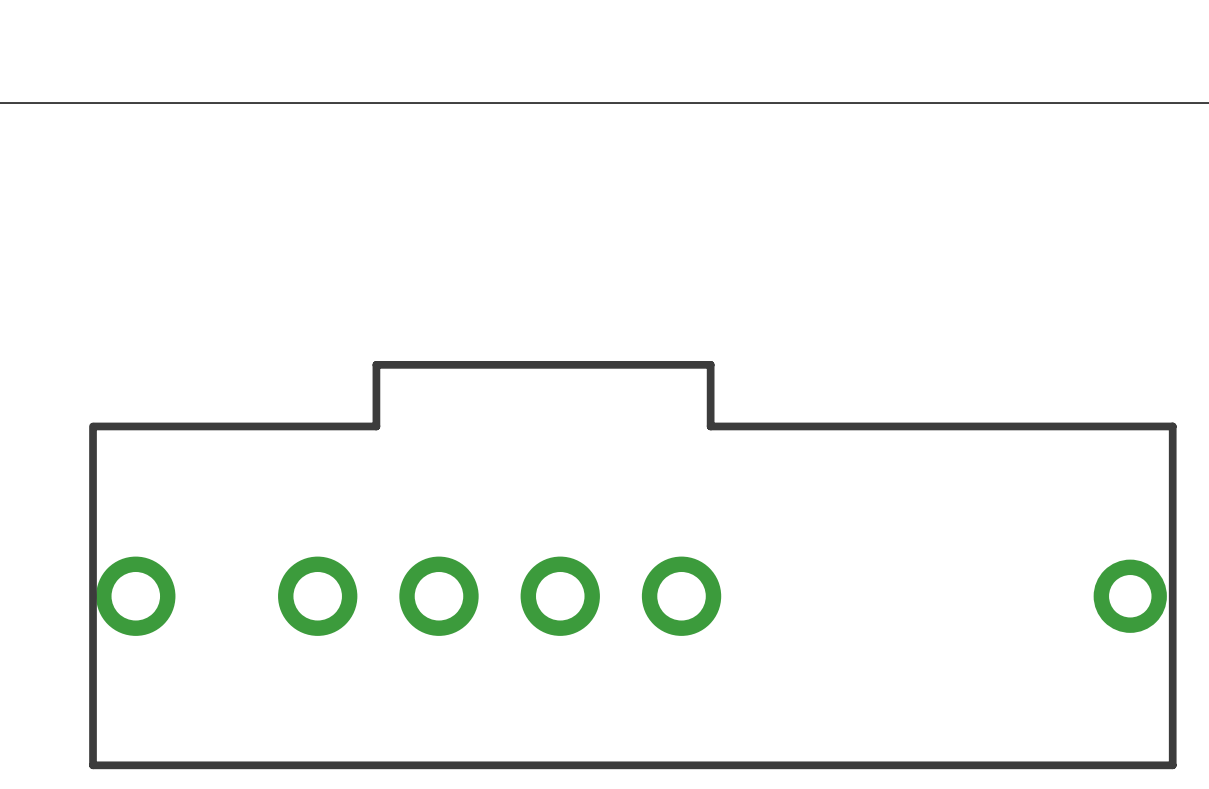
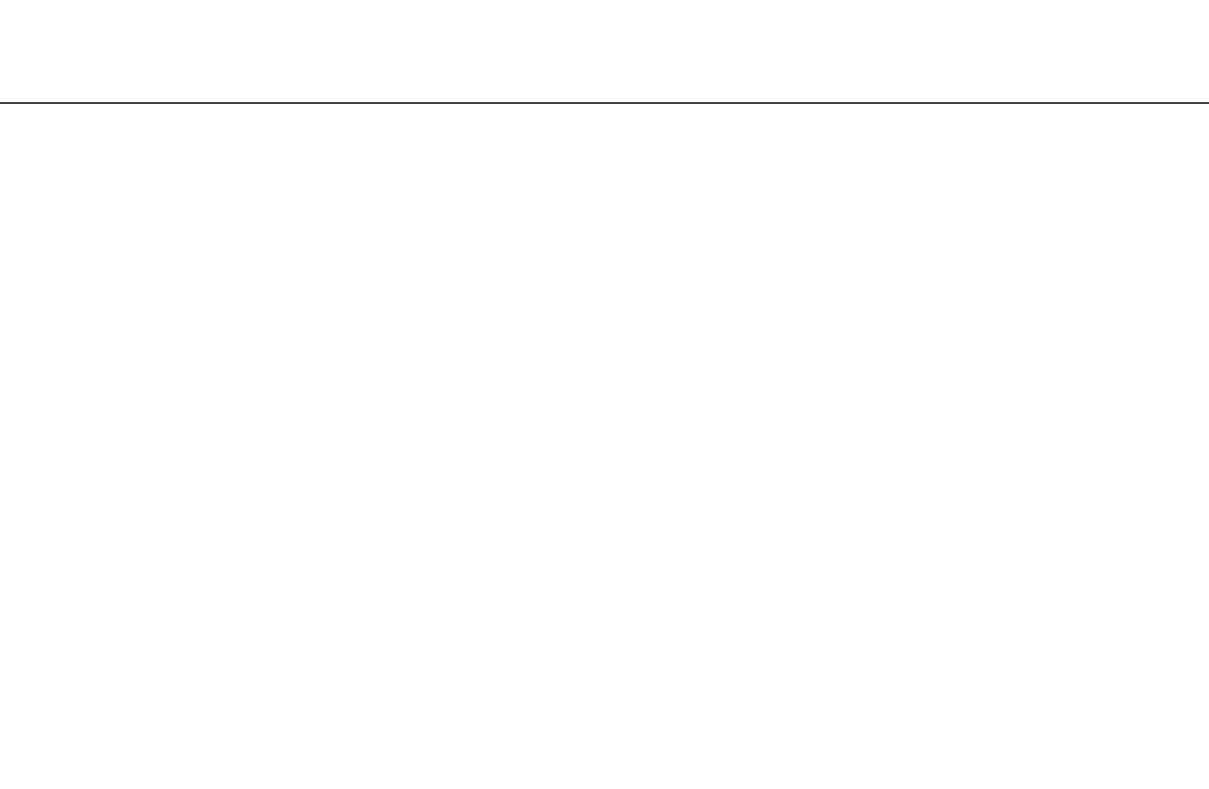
part: (632, 565) -> none

